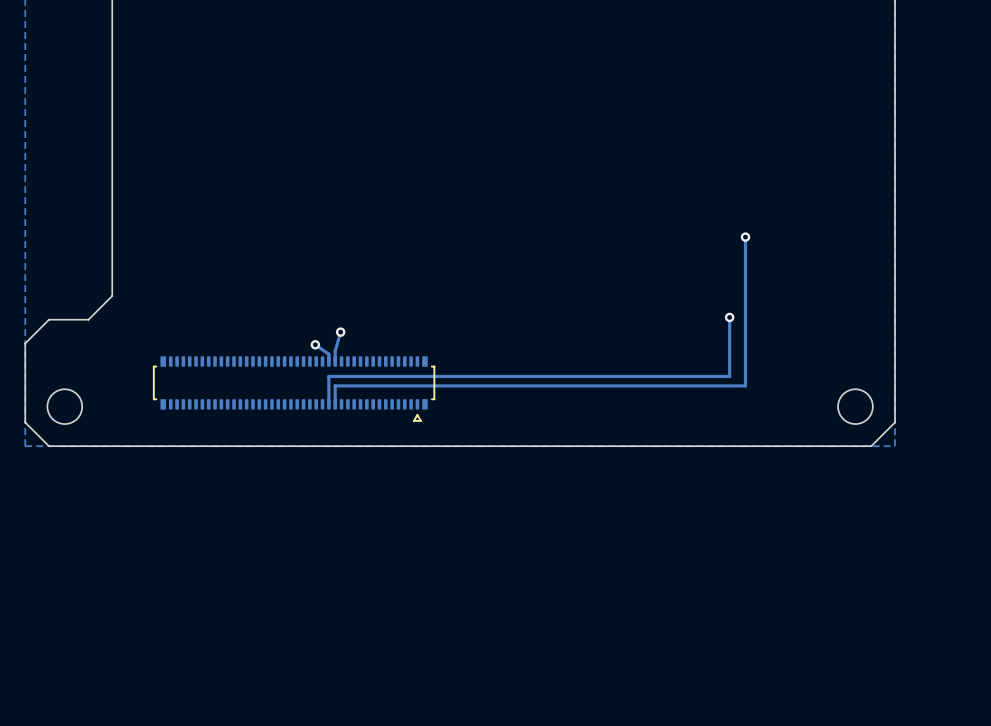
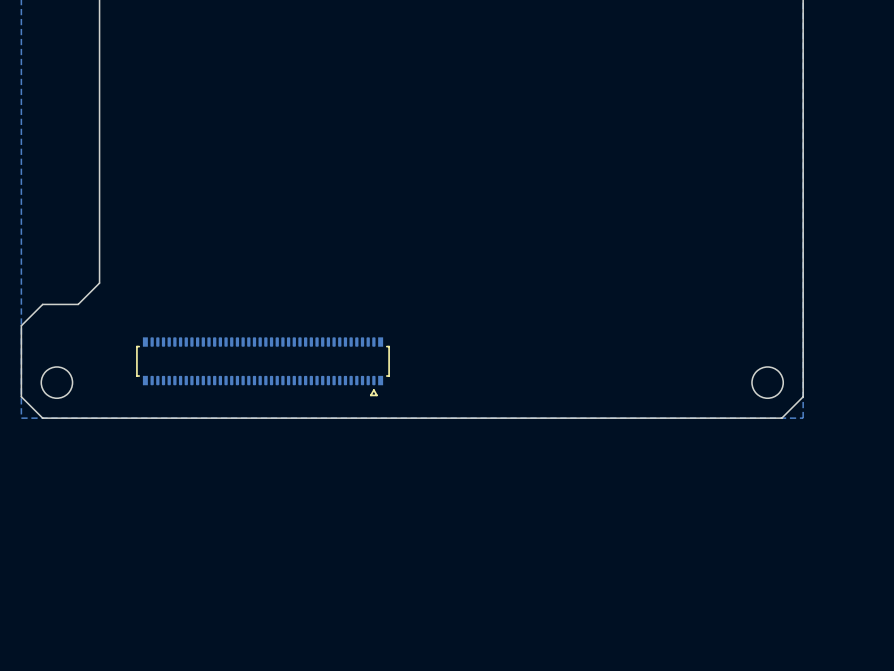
track: (745, 237) (745, 385) (335, 385) (335, 404) -> none
via: (745, 237) -> none
track: (729, 317) (729, 376) (328, 376) (328, 404) -> none
via: (729, 317) -> none
track: (340, 332) (335, 351) (335, 361) -> none
via: (340, 332) -> none
track: (315, 344) (328, 354) (328, 361) -> none
via: (315, 344) -> none

